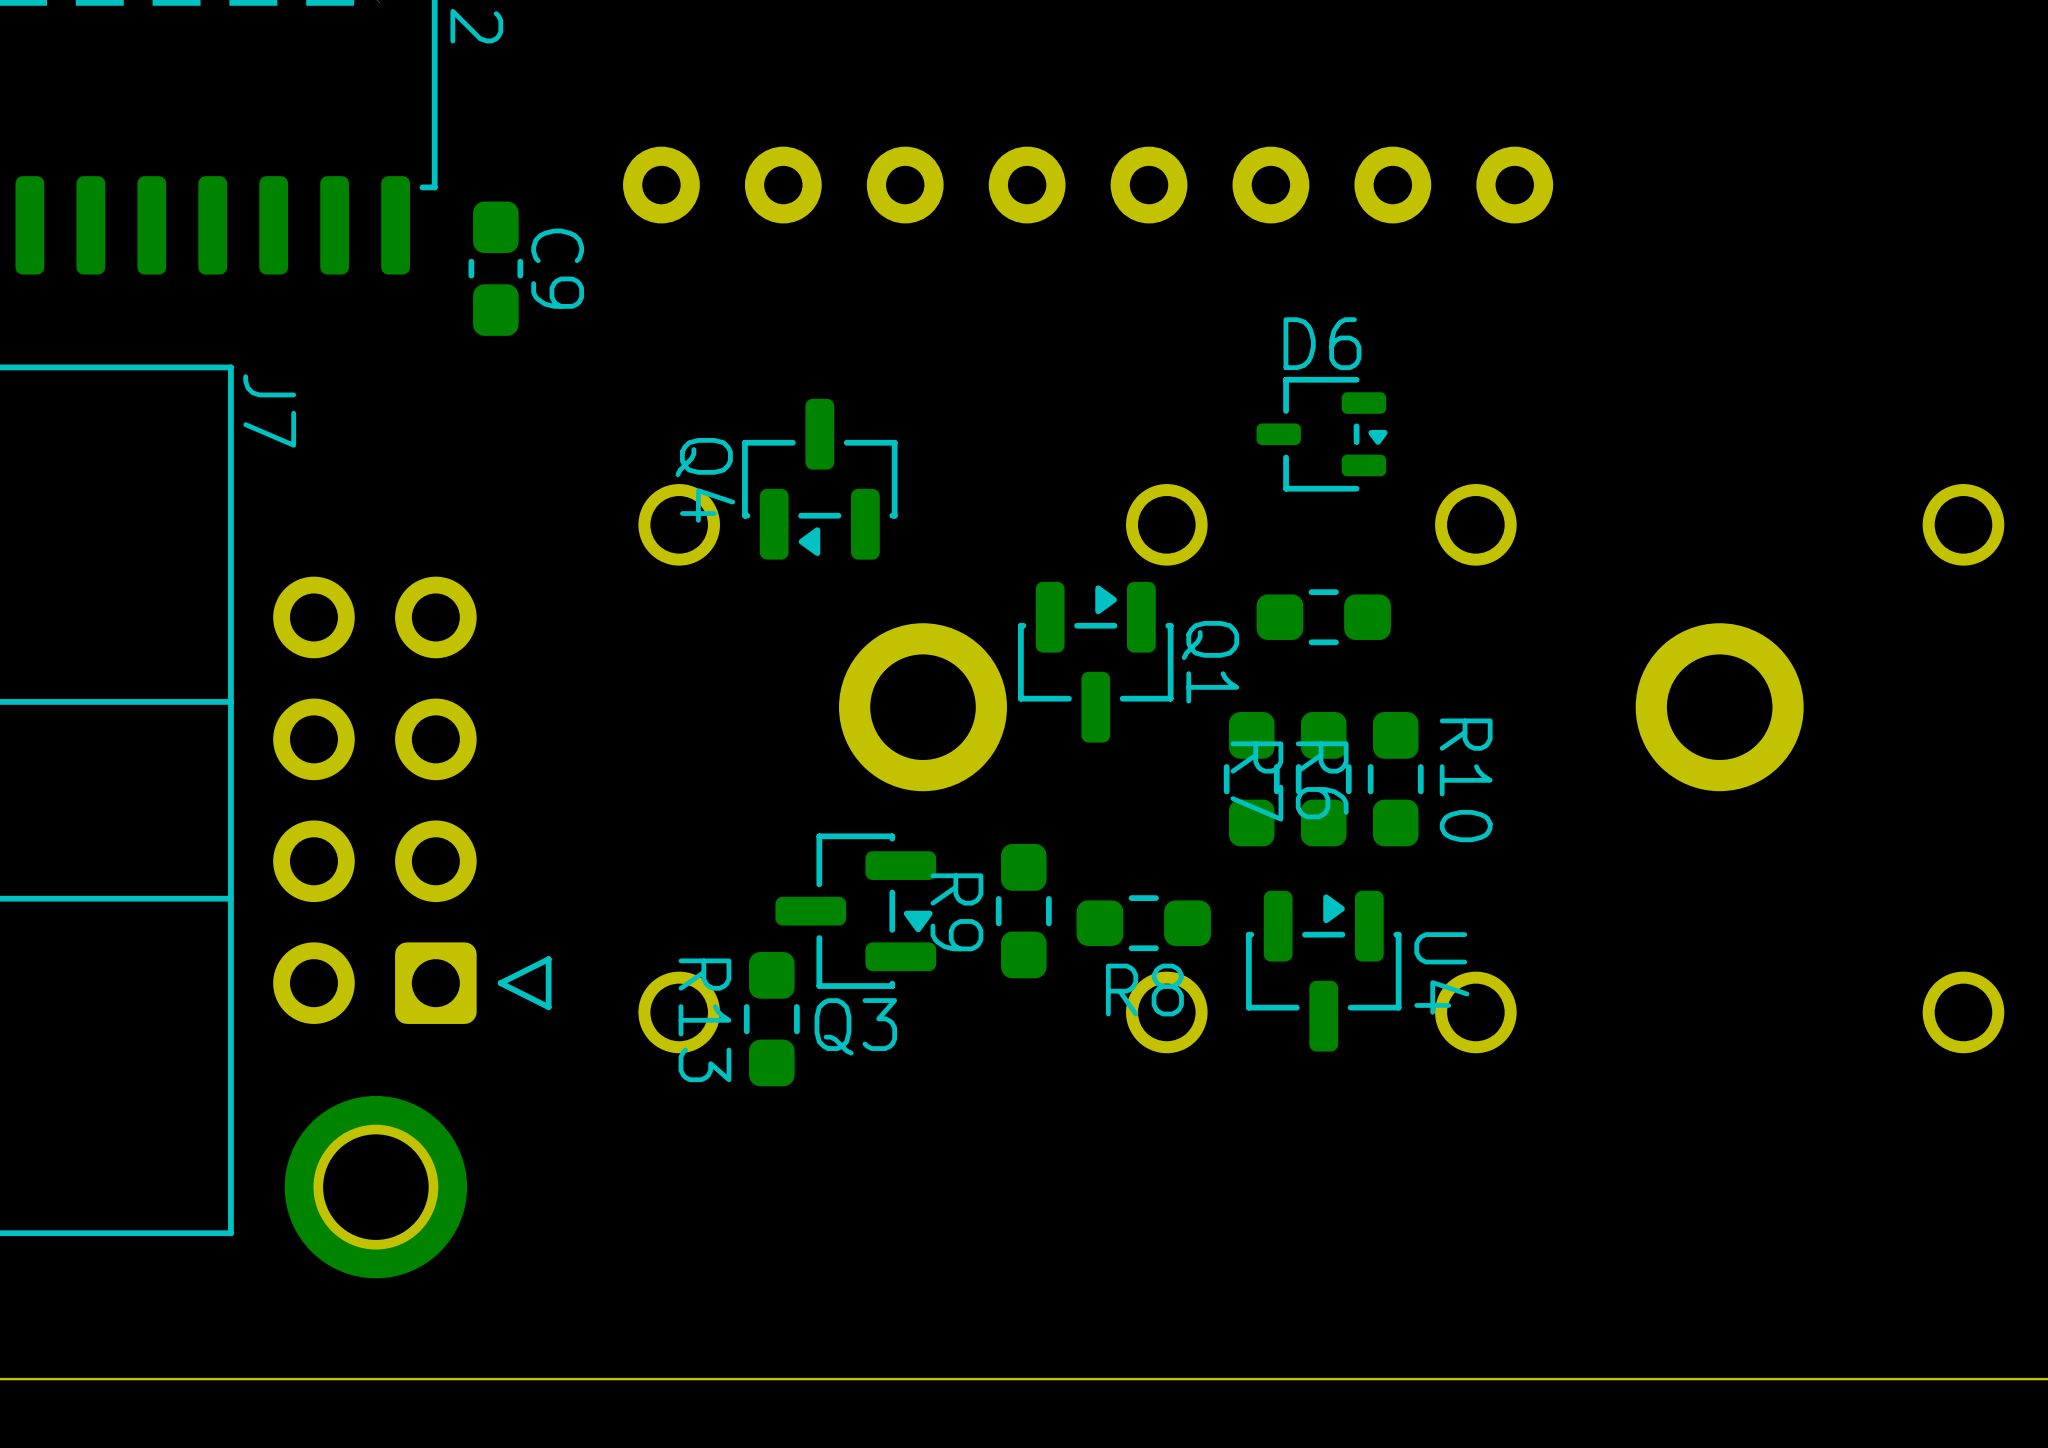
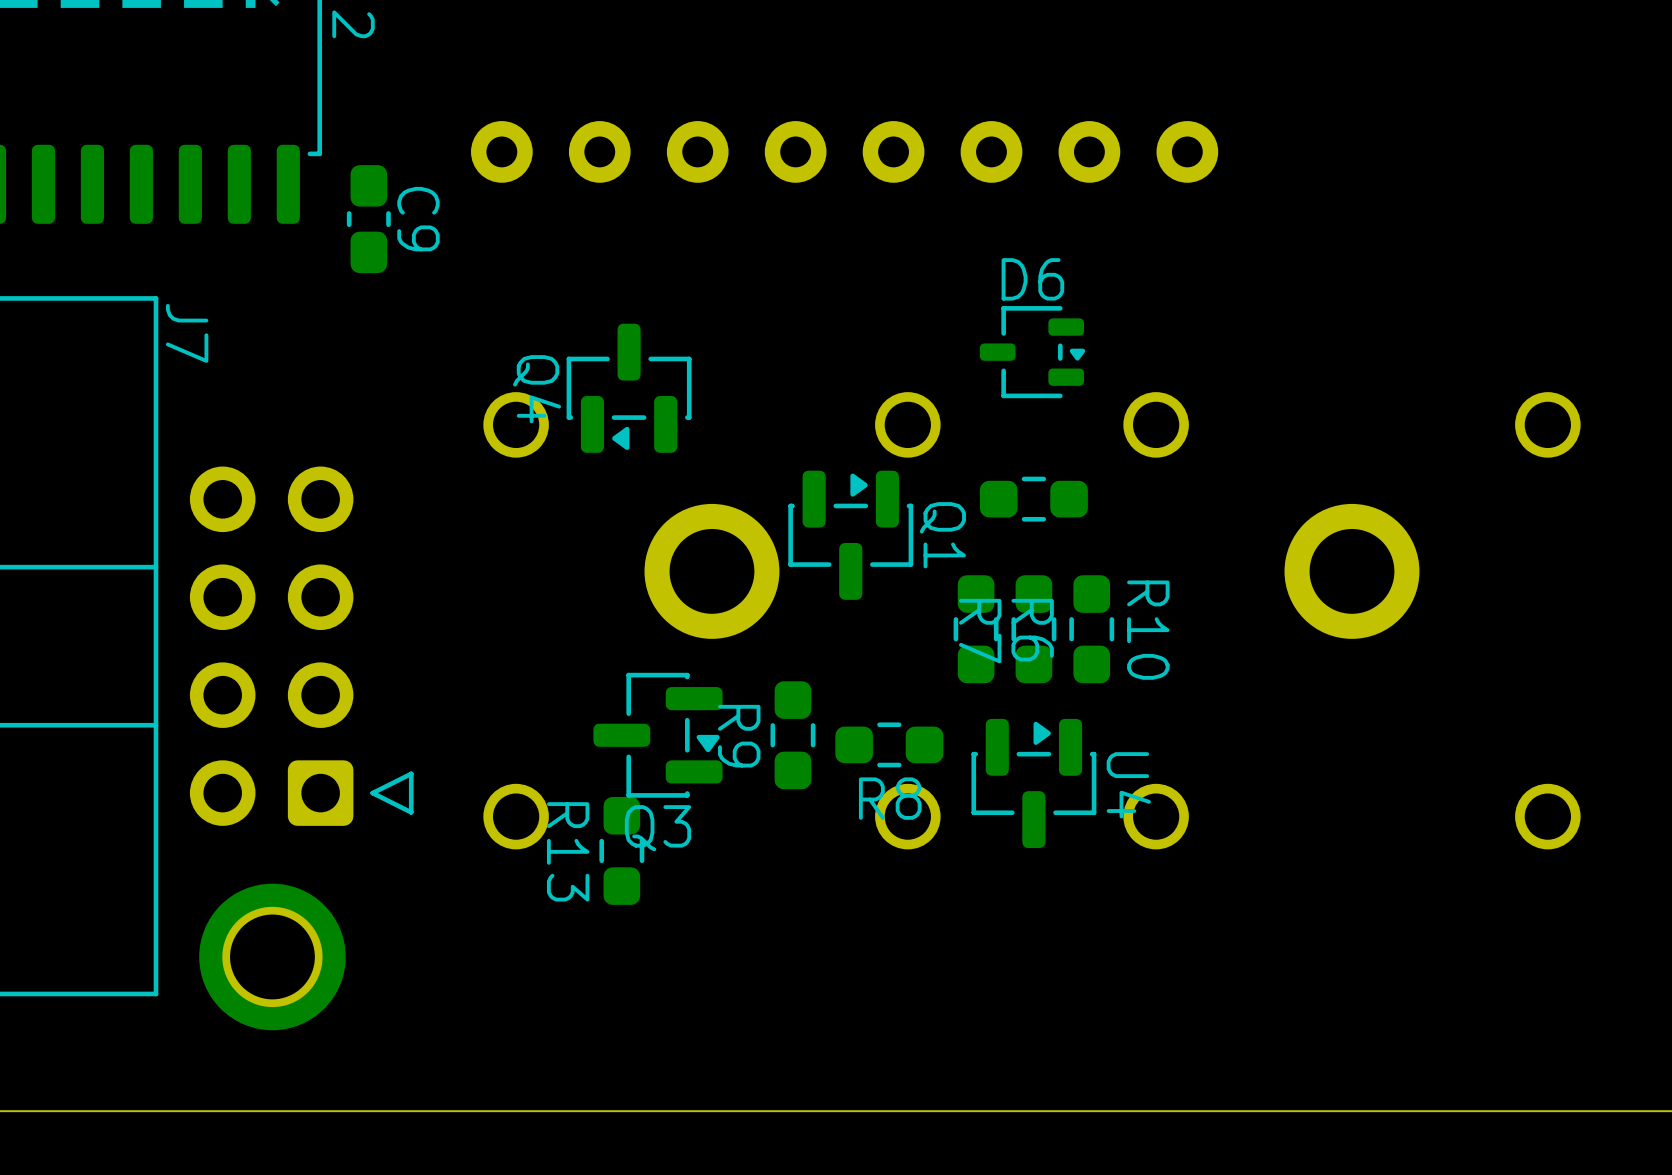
R13 position: (771, 1019) -> (621, 850)

